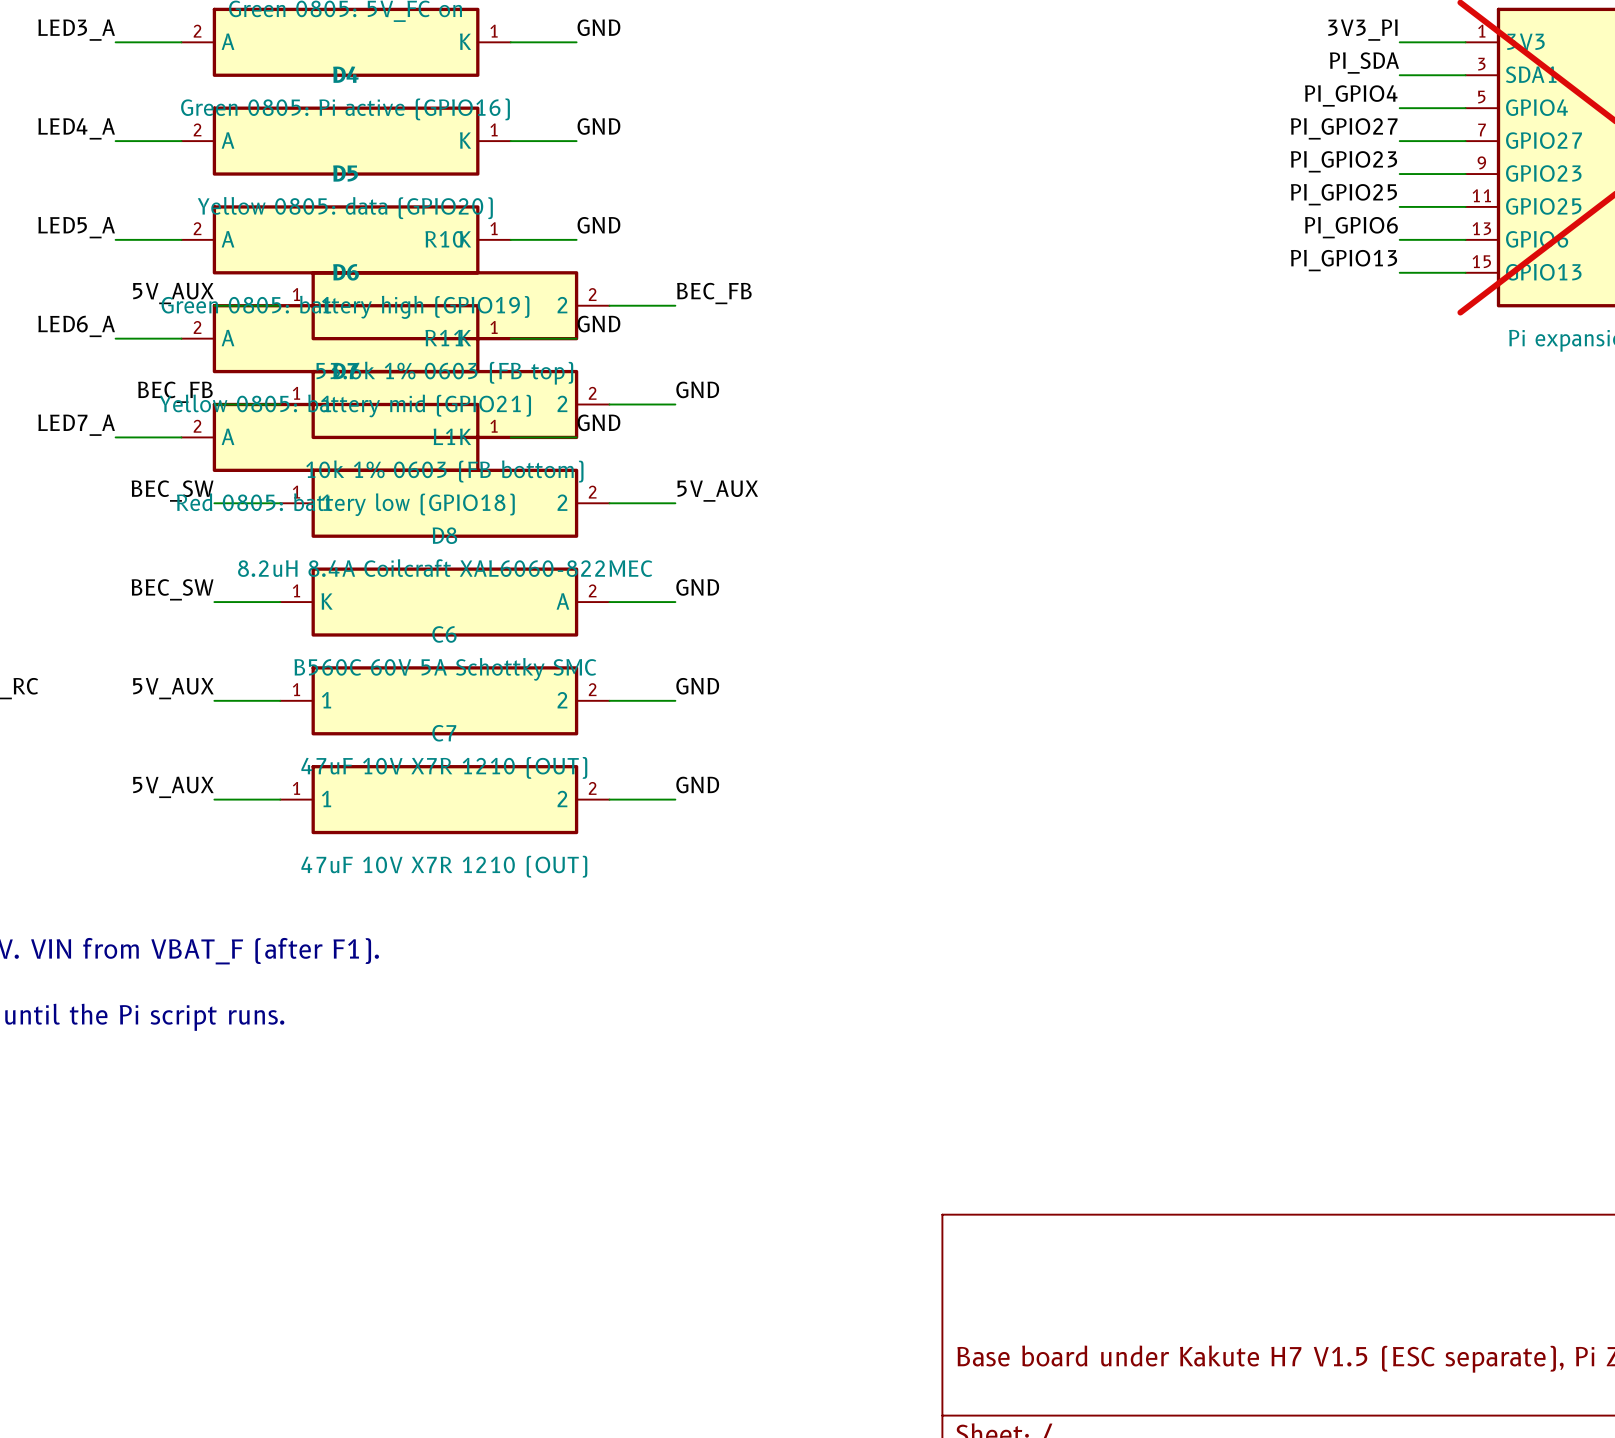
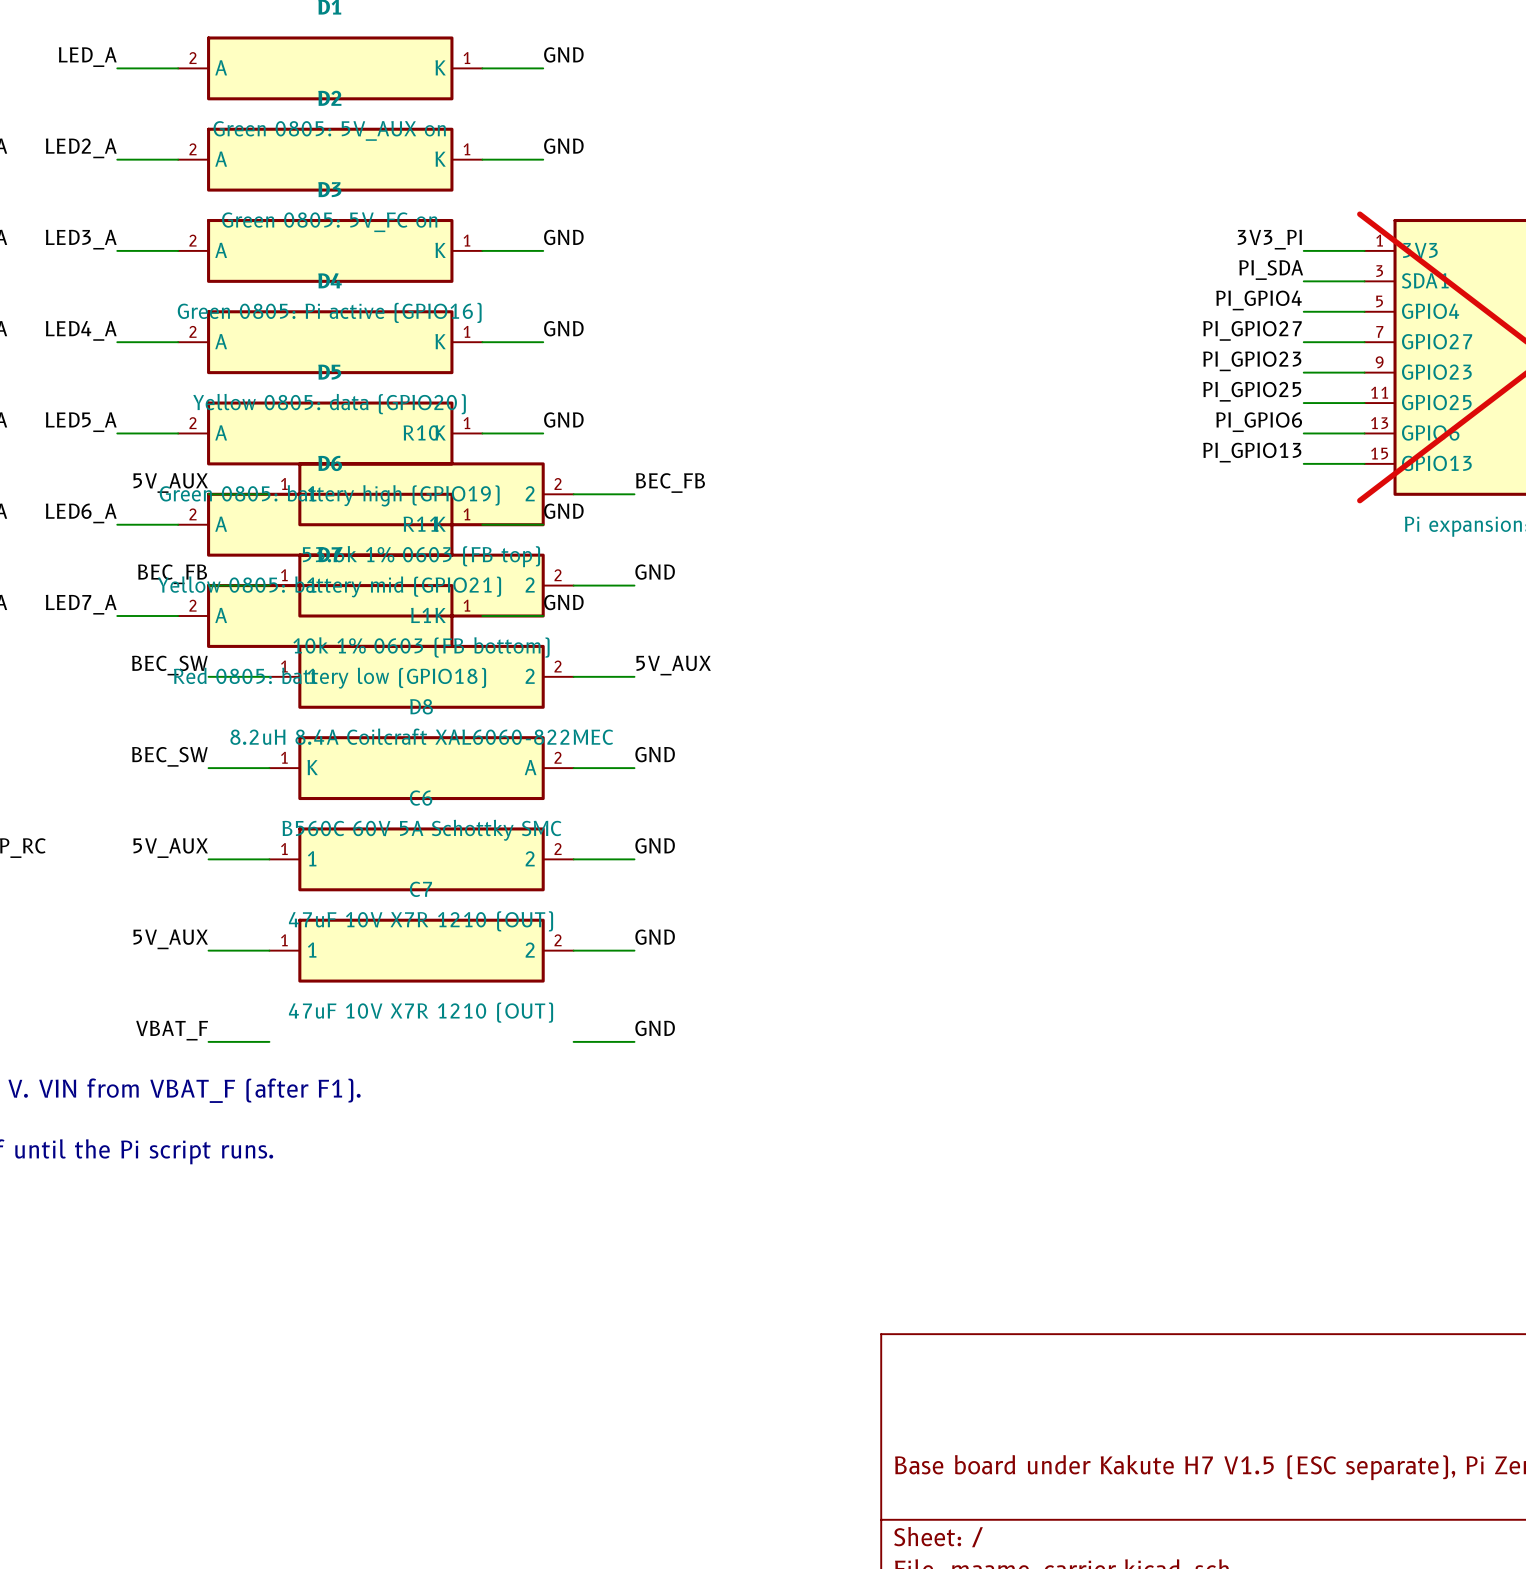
label: none -> GND (655, 1028)
label: none -> VBAT_F (172, 1030)
wire: none -> (208, 1041) (269, 1041)
wire: none -> (573, 1041) (634, 1041)

